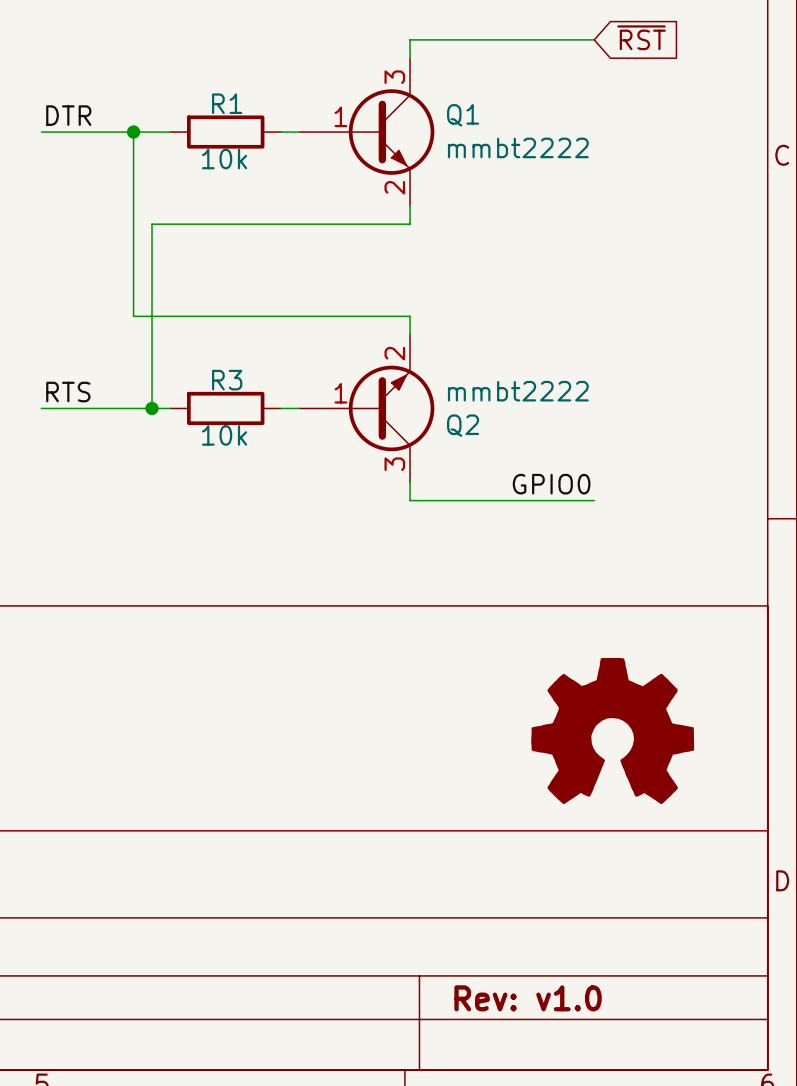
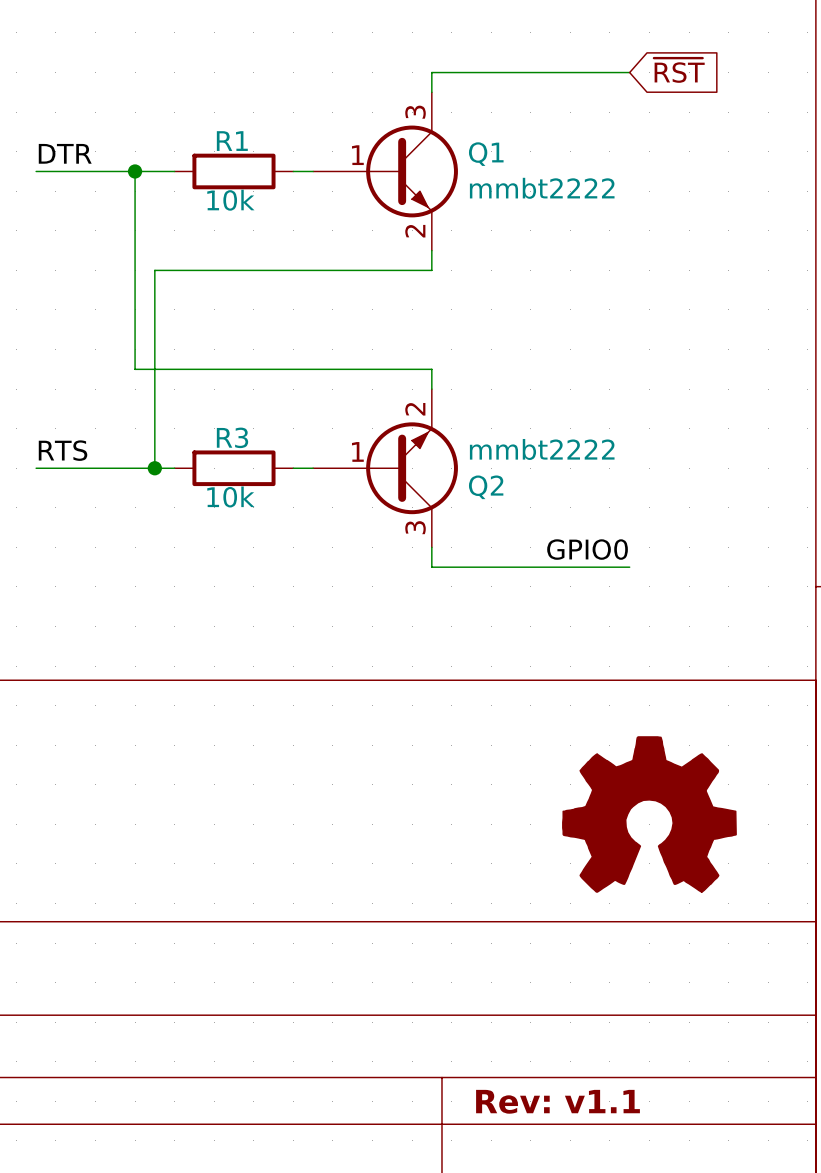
title block: Rev: v1.0 (528, 998) -> Rev: v1.1 (558, 1101)

